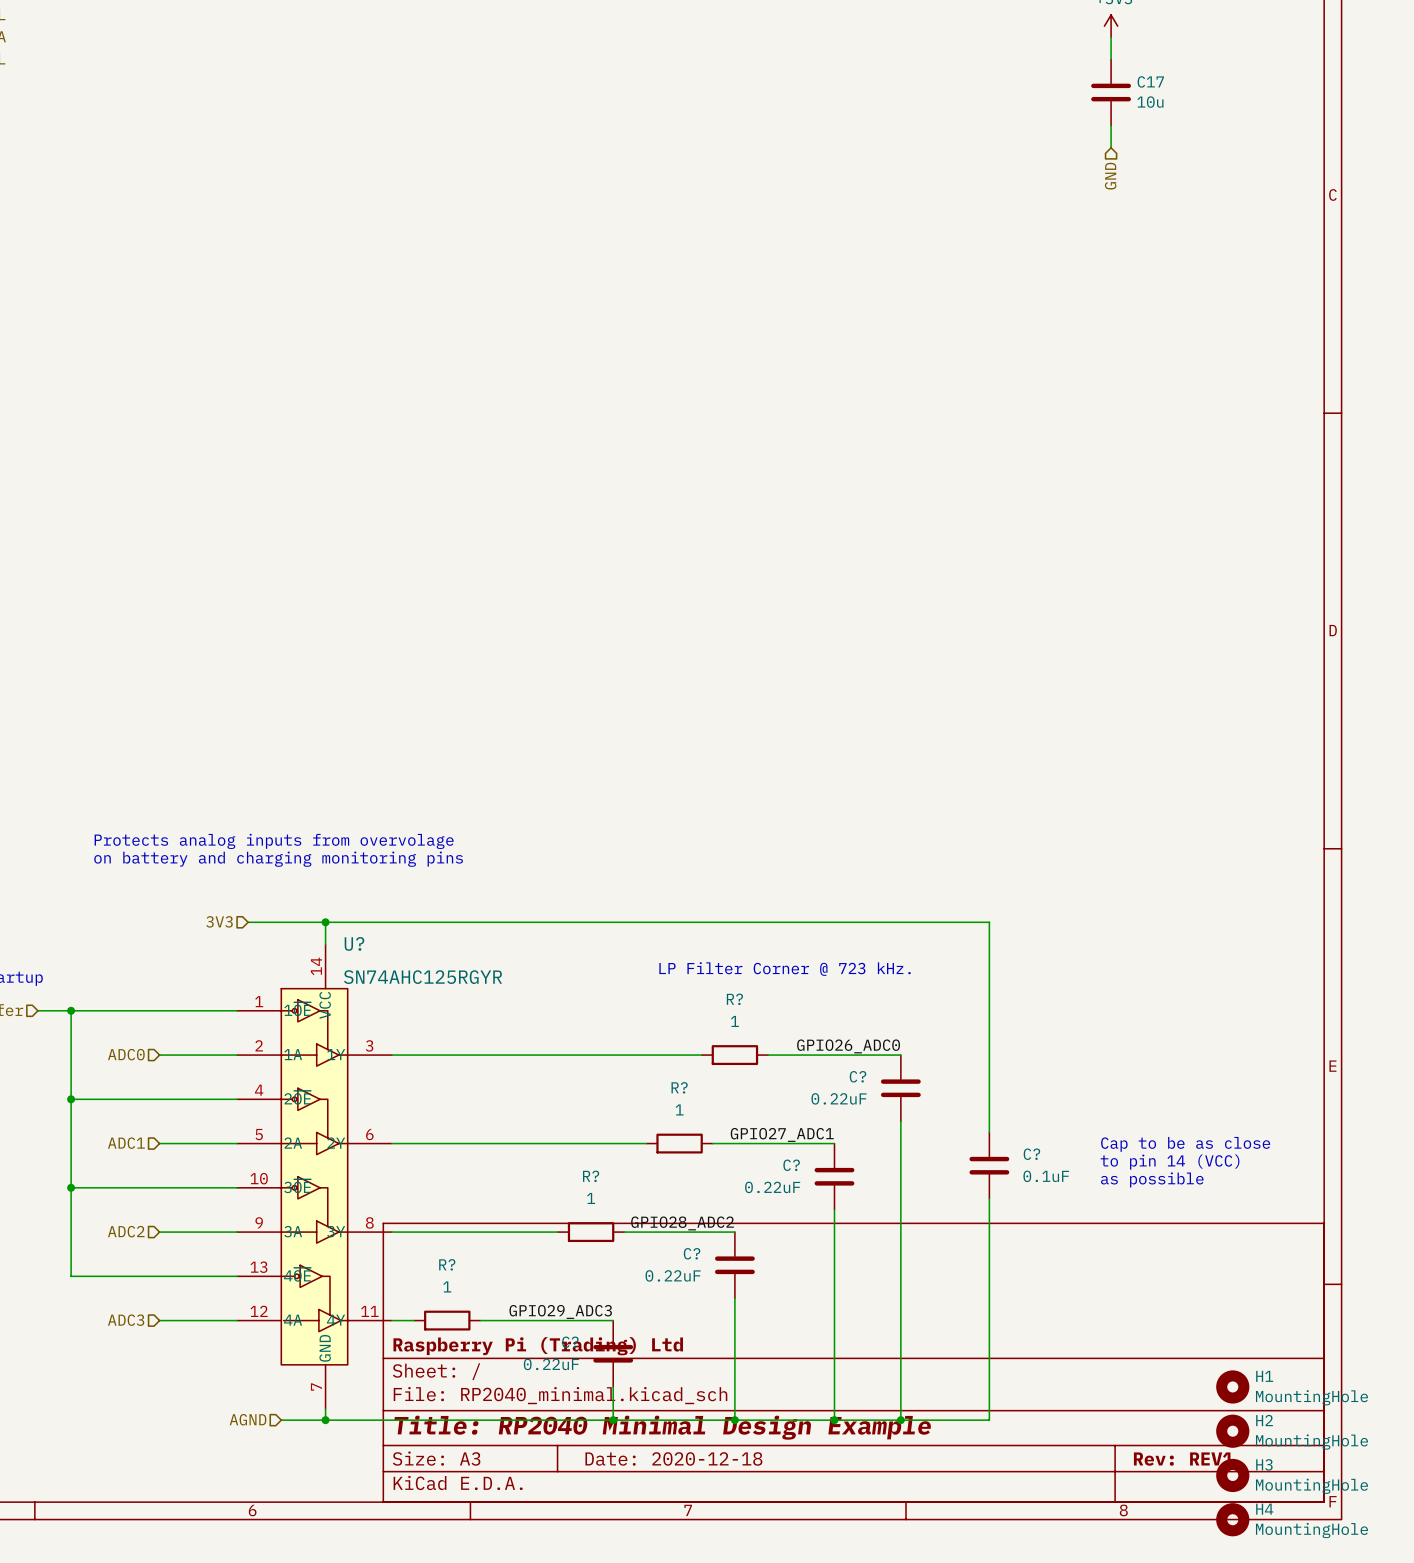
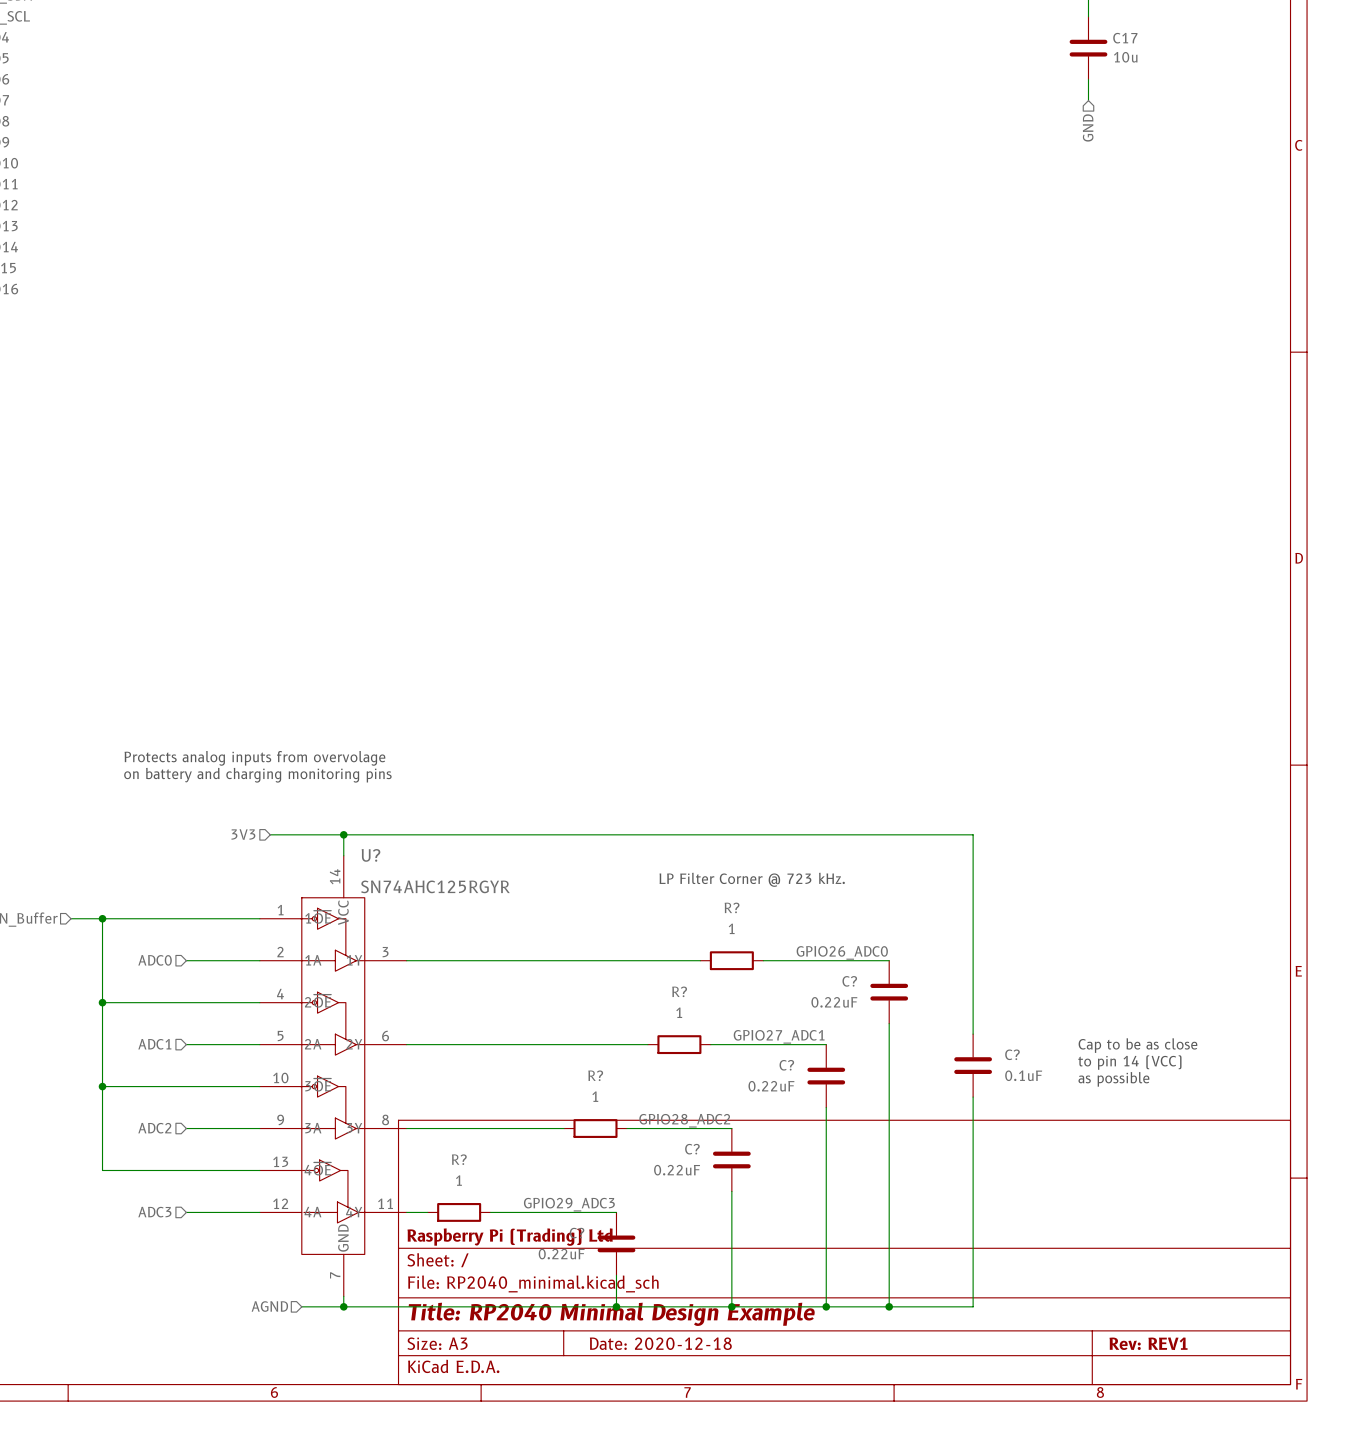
H1: MountingHole (1232, 1386) -> none
H2: MountingHole (1232, 1431) -> none
H3: MountingHole (1232, 1475) -> none
H4: MountingHole (1232, 1519) -> none

